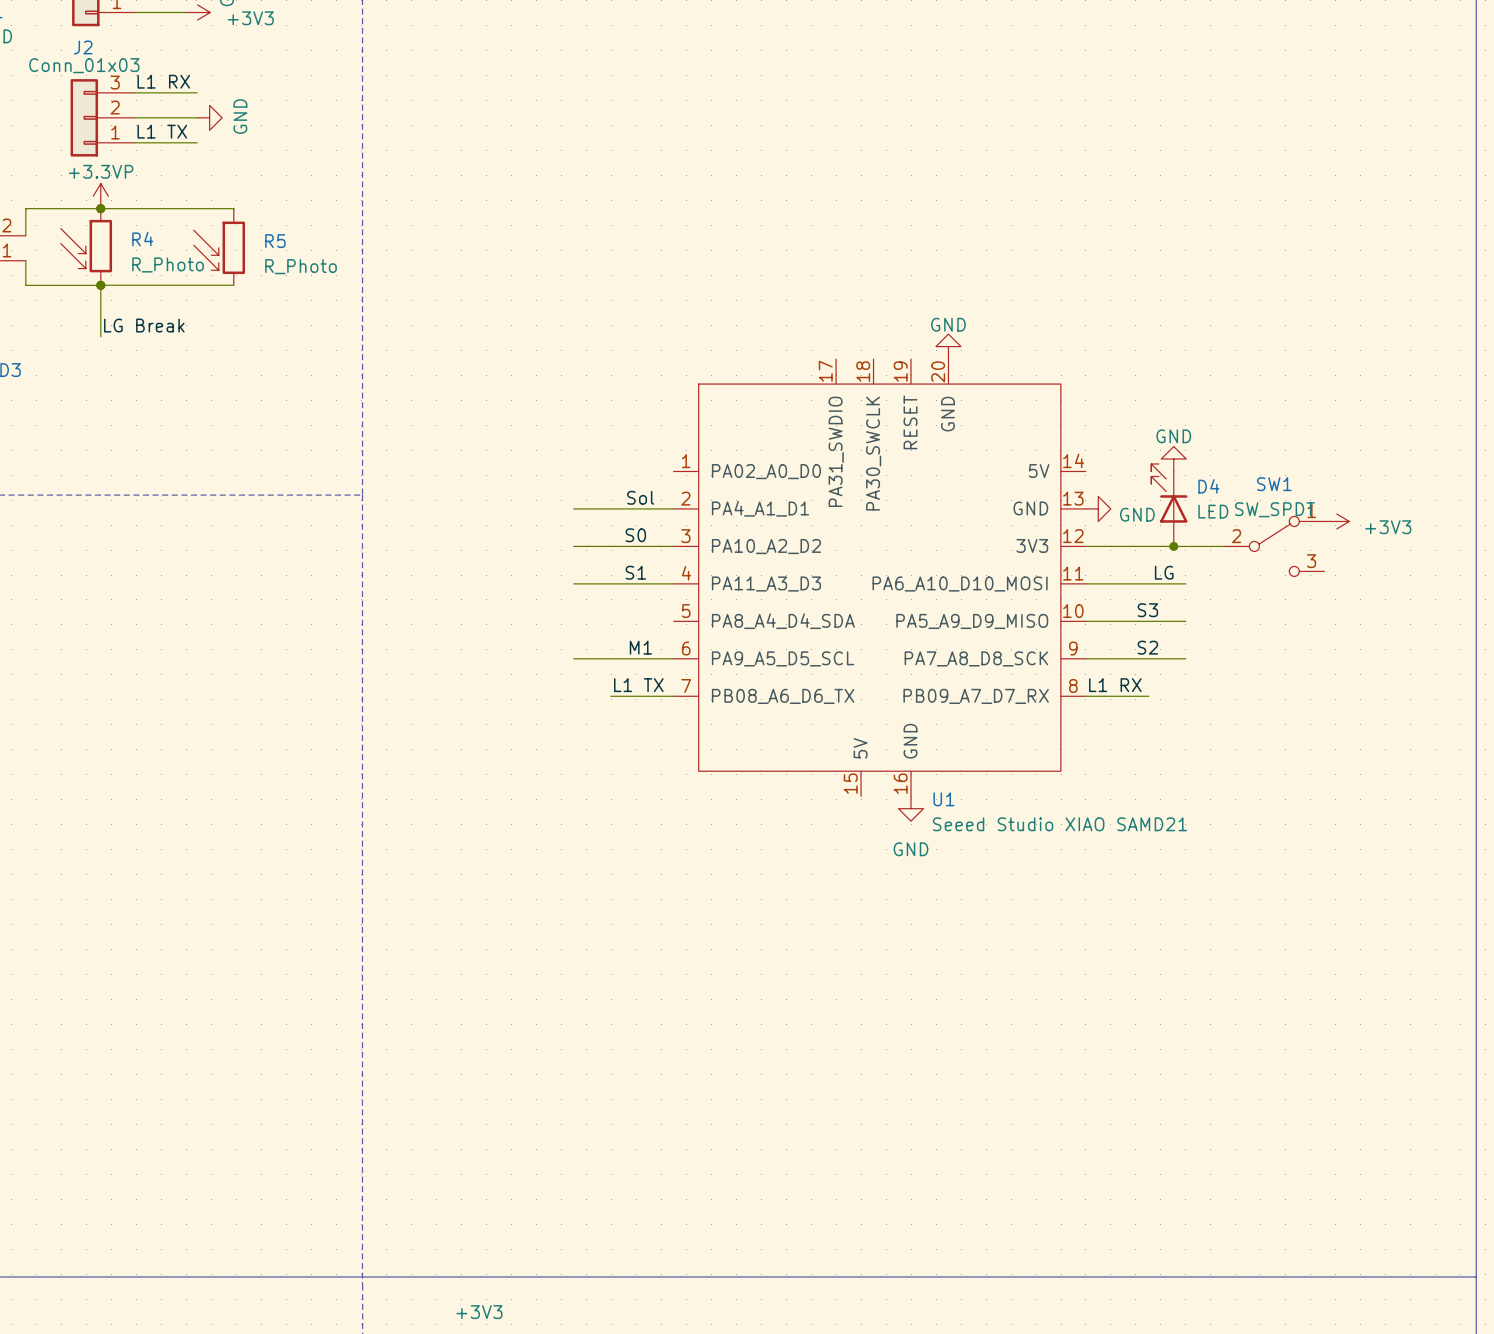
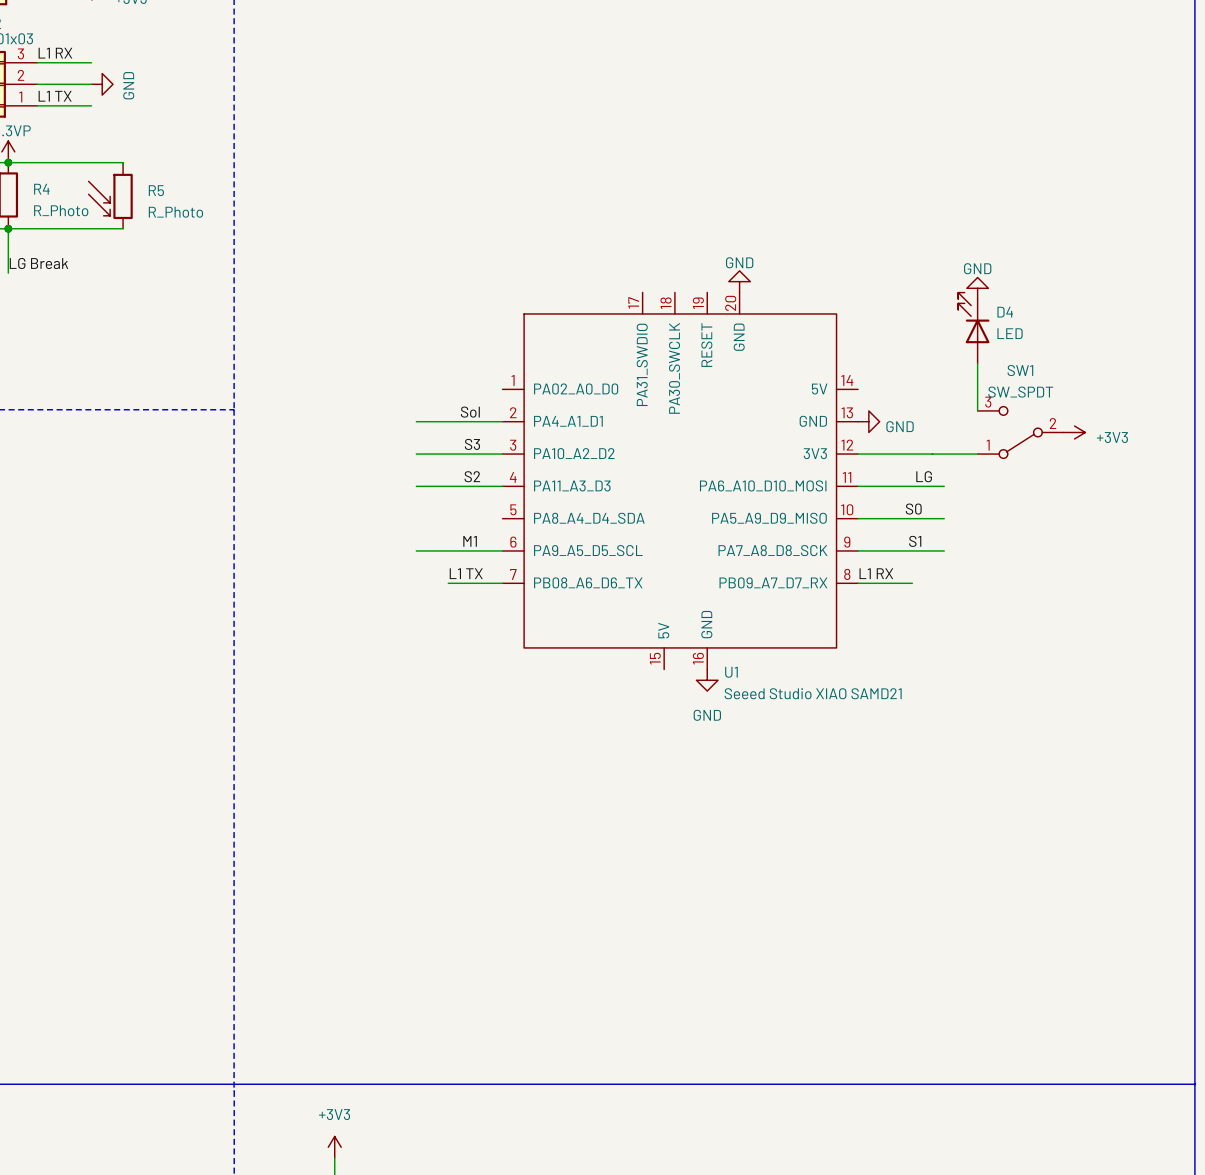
wire: none -> (977, 363) (977, 410)
power symbol position: GND (1173, 459) -> GND (977, 288)
D4 position: (1169, 505) -> (973, 328)
label: S0 (635, 535) -> S3 (472, 444)
junction: (1173, 546) -> none
SW1 rotation: 0° (1274, 546) -> 180° (1020, 432)
label: S1 (635, 572) -> S2 (472, 476)
label: S3 (1147, 610) -> S0 (913, 509)
label: S2 (1147, 647) -> S1 (915, 541)

